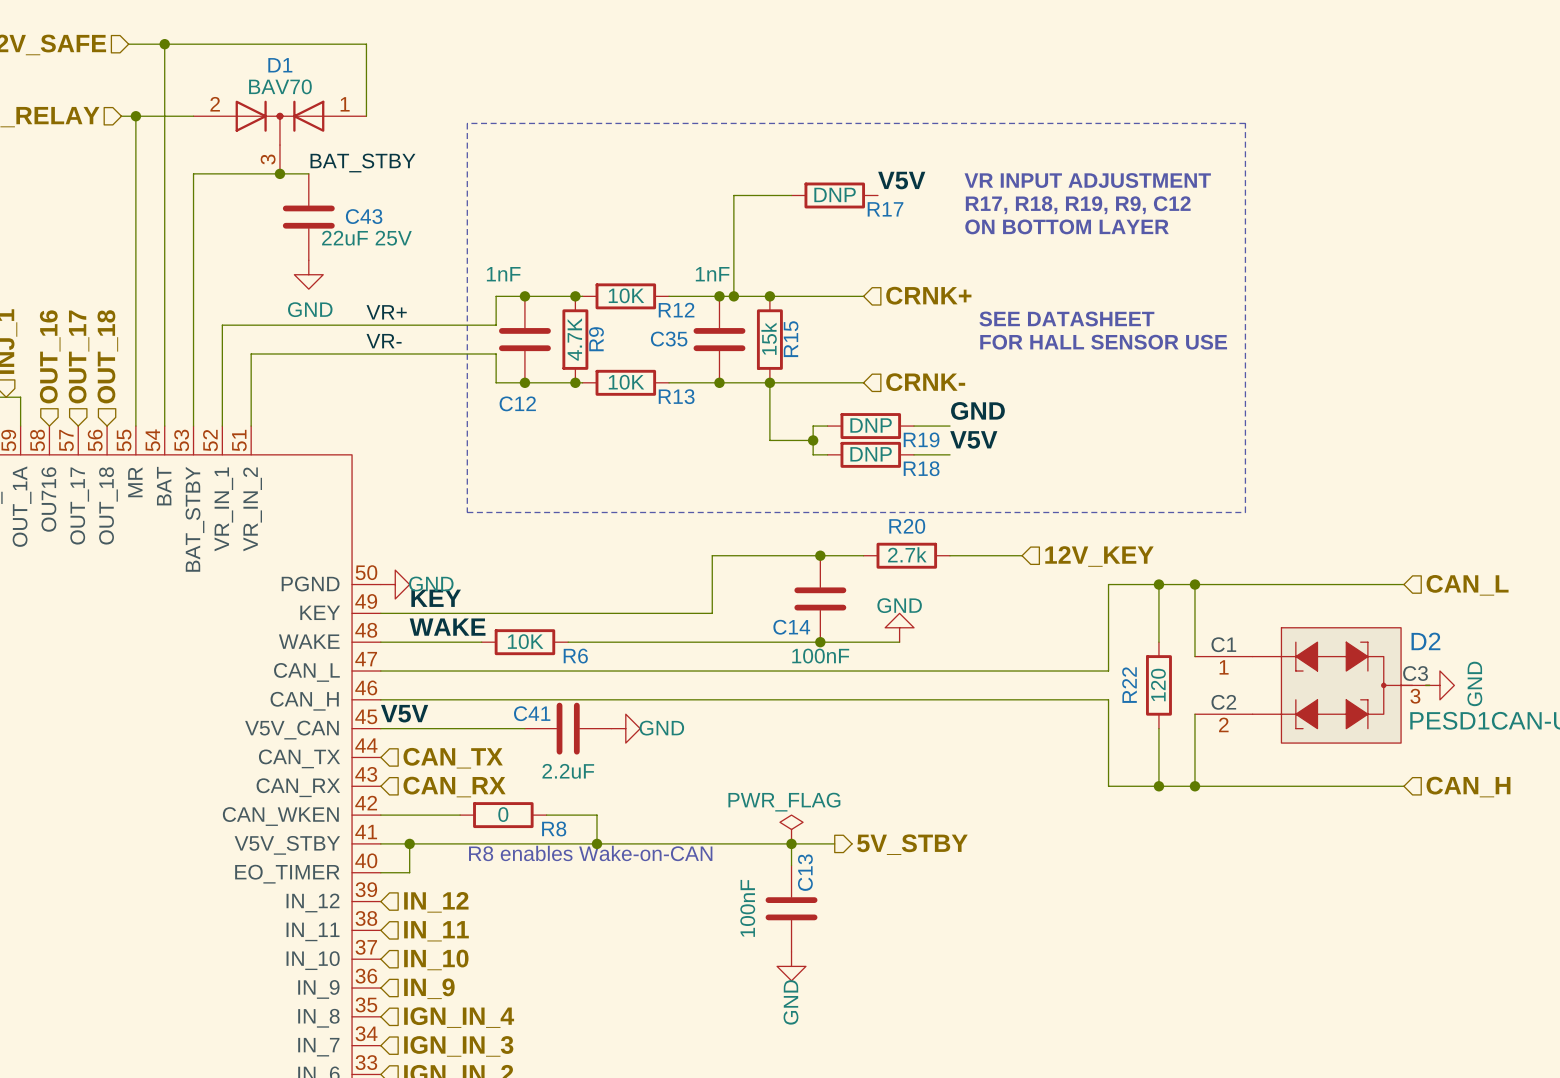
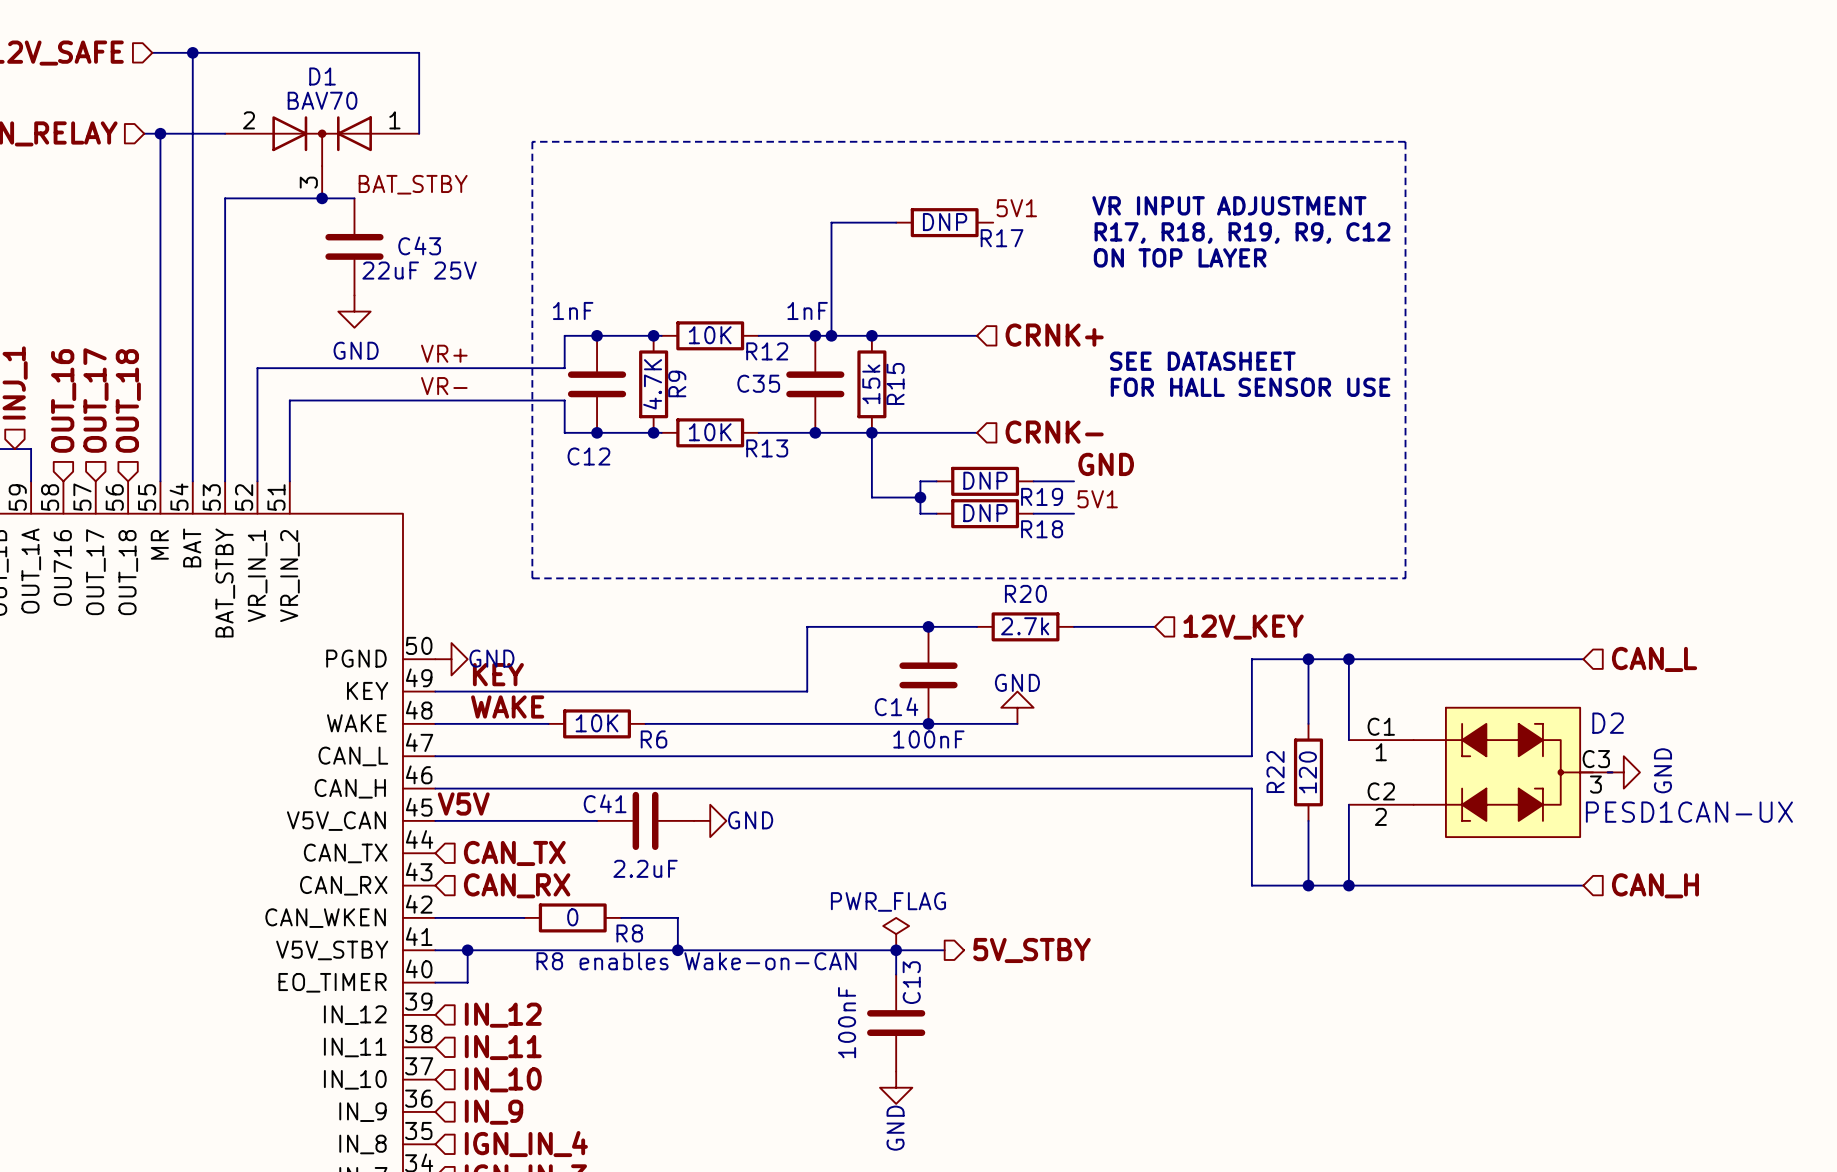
label: V5V (901, 180) -> 5V1 (1016, 208)
text: ON BOTTOM LAYER (1067, 226) -> ON TOP LAYER (1180, 257)
label: V5V (973, 439) -> 5V1 (1097, 499)

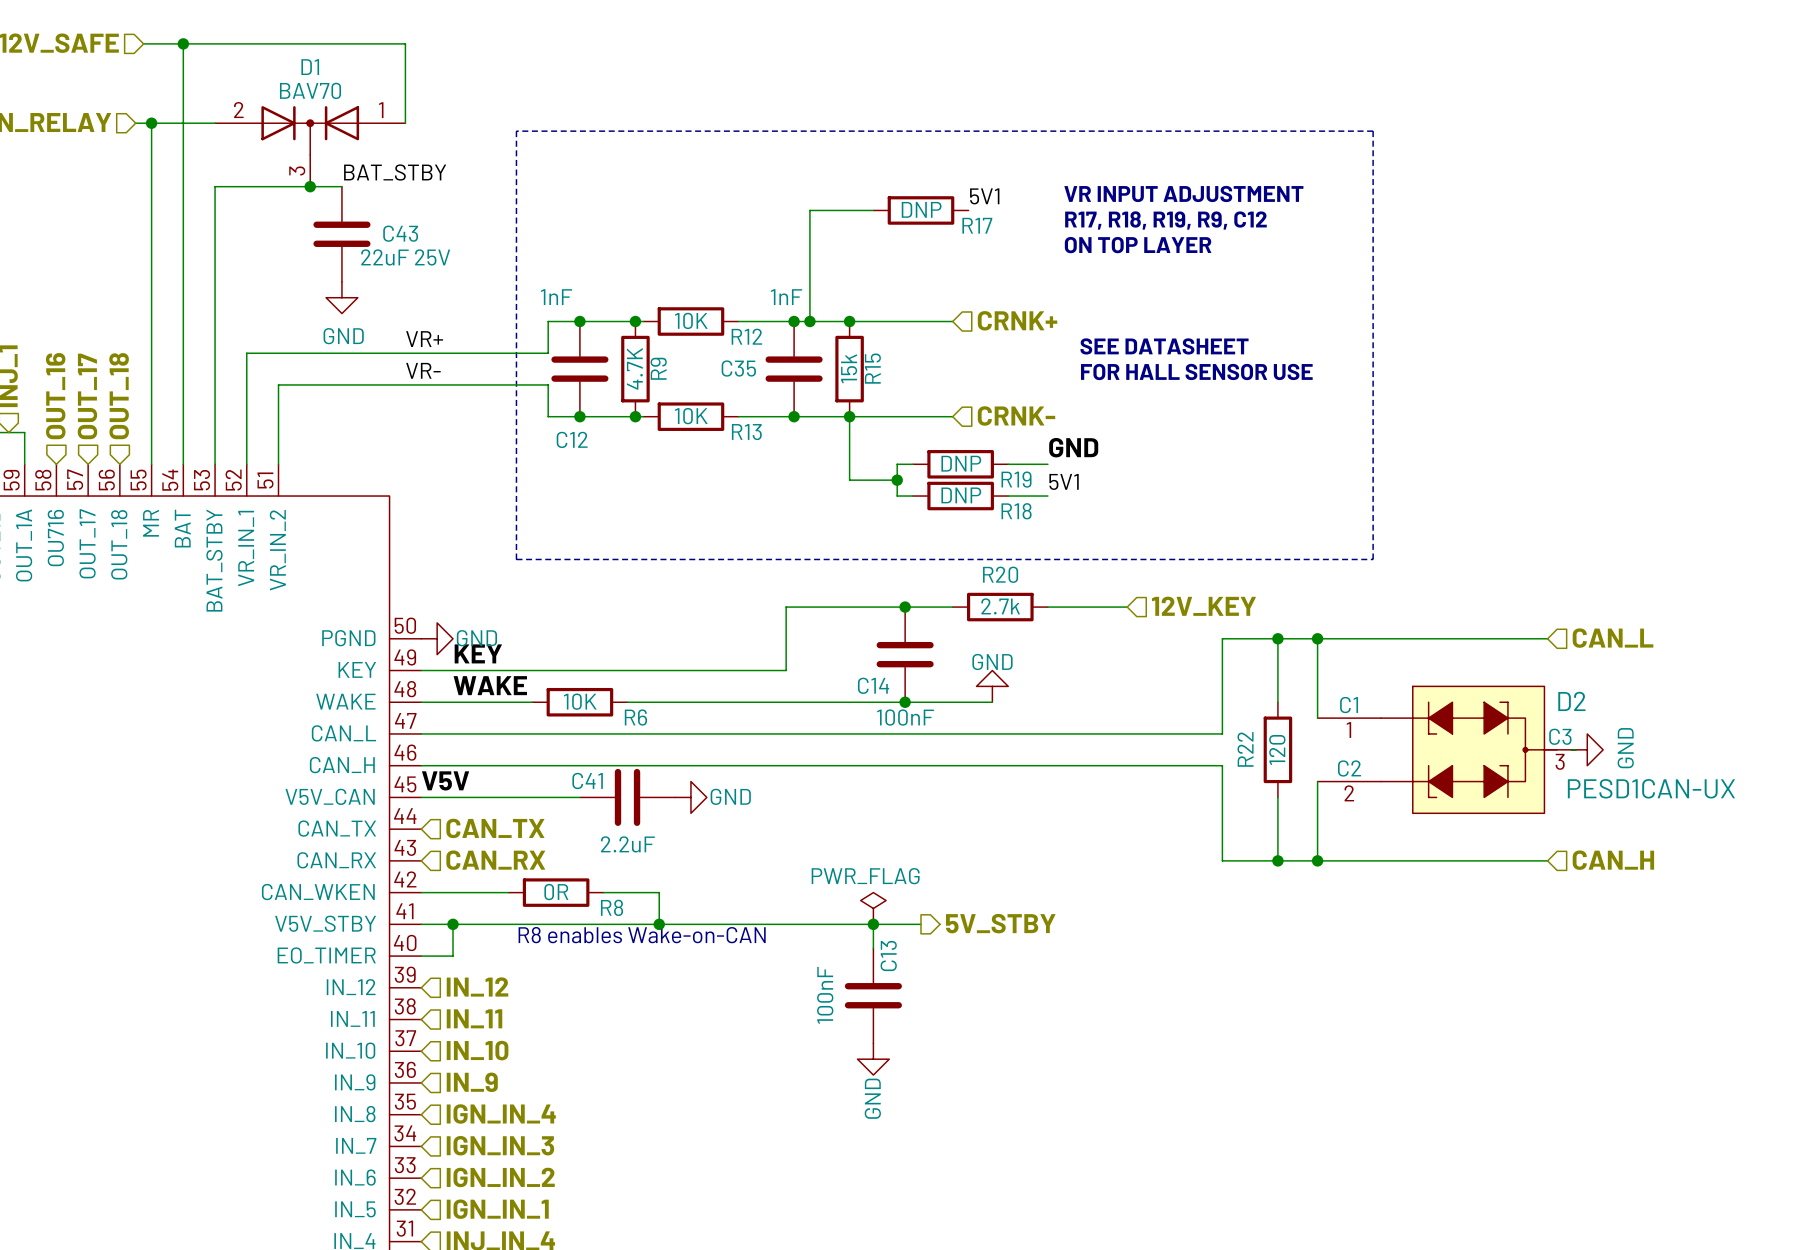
R8 value: 0 (572, 917) -> 0R (556, 892)

